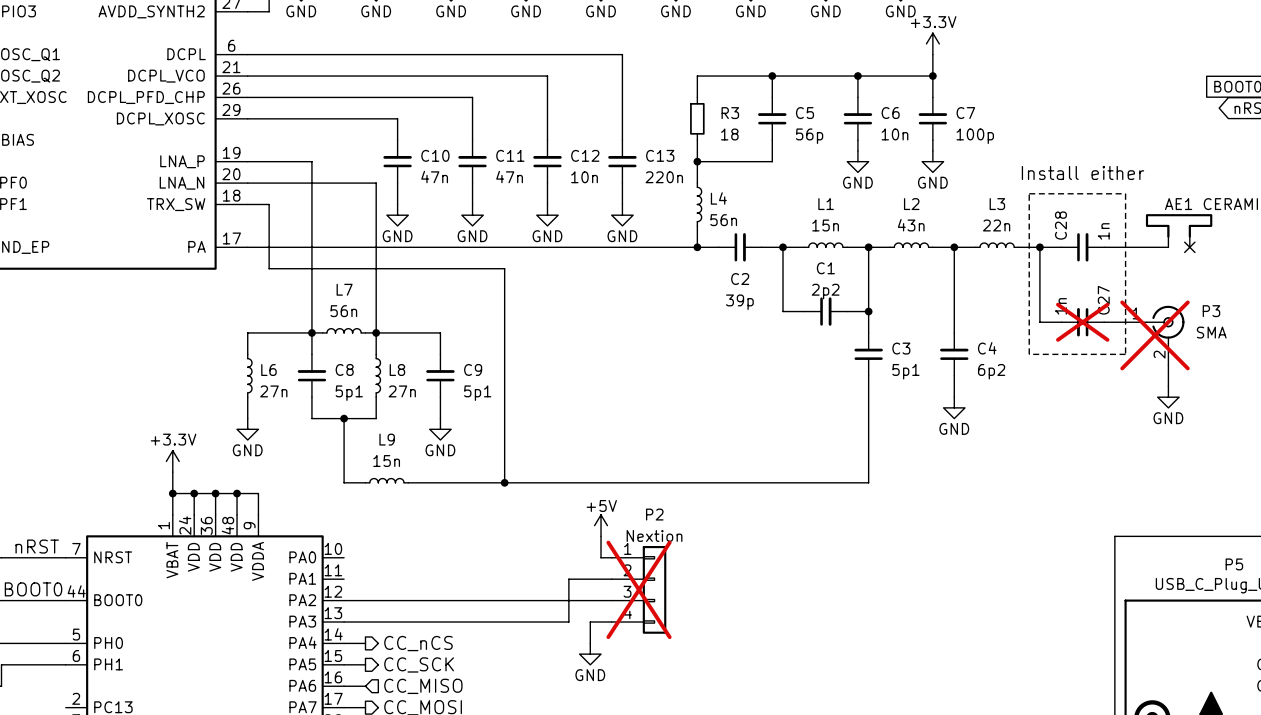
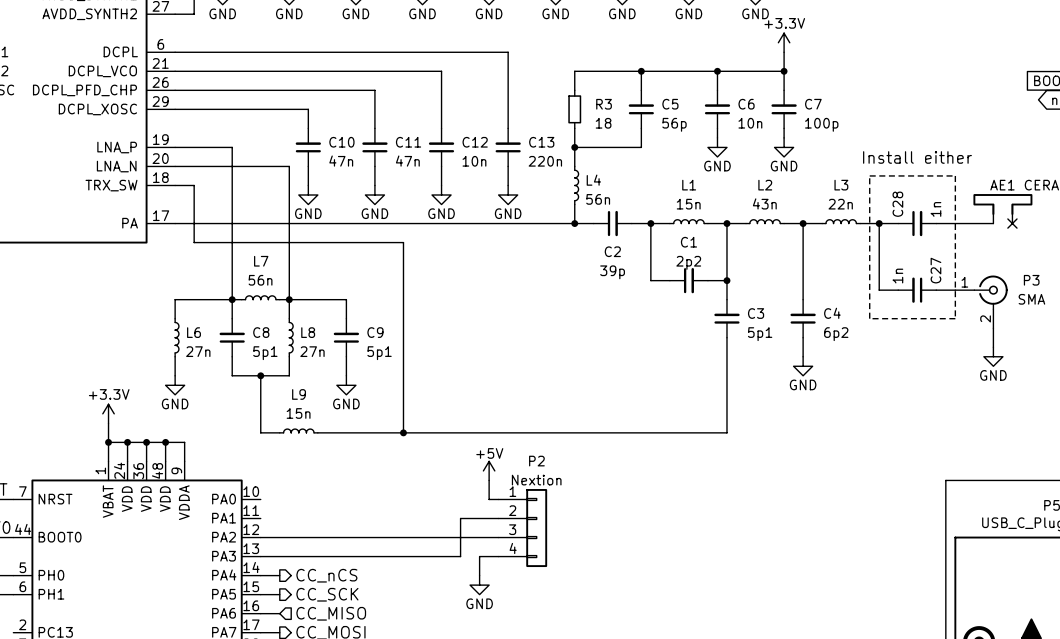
C27 do-not-place cross: (1082, 322) -> none
P3 do-not-place cross: (1155, 335) -> none
P2 do-not-place cross: (639, 589) -> none

